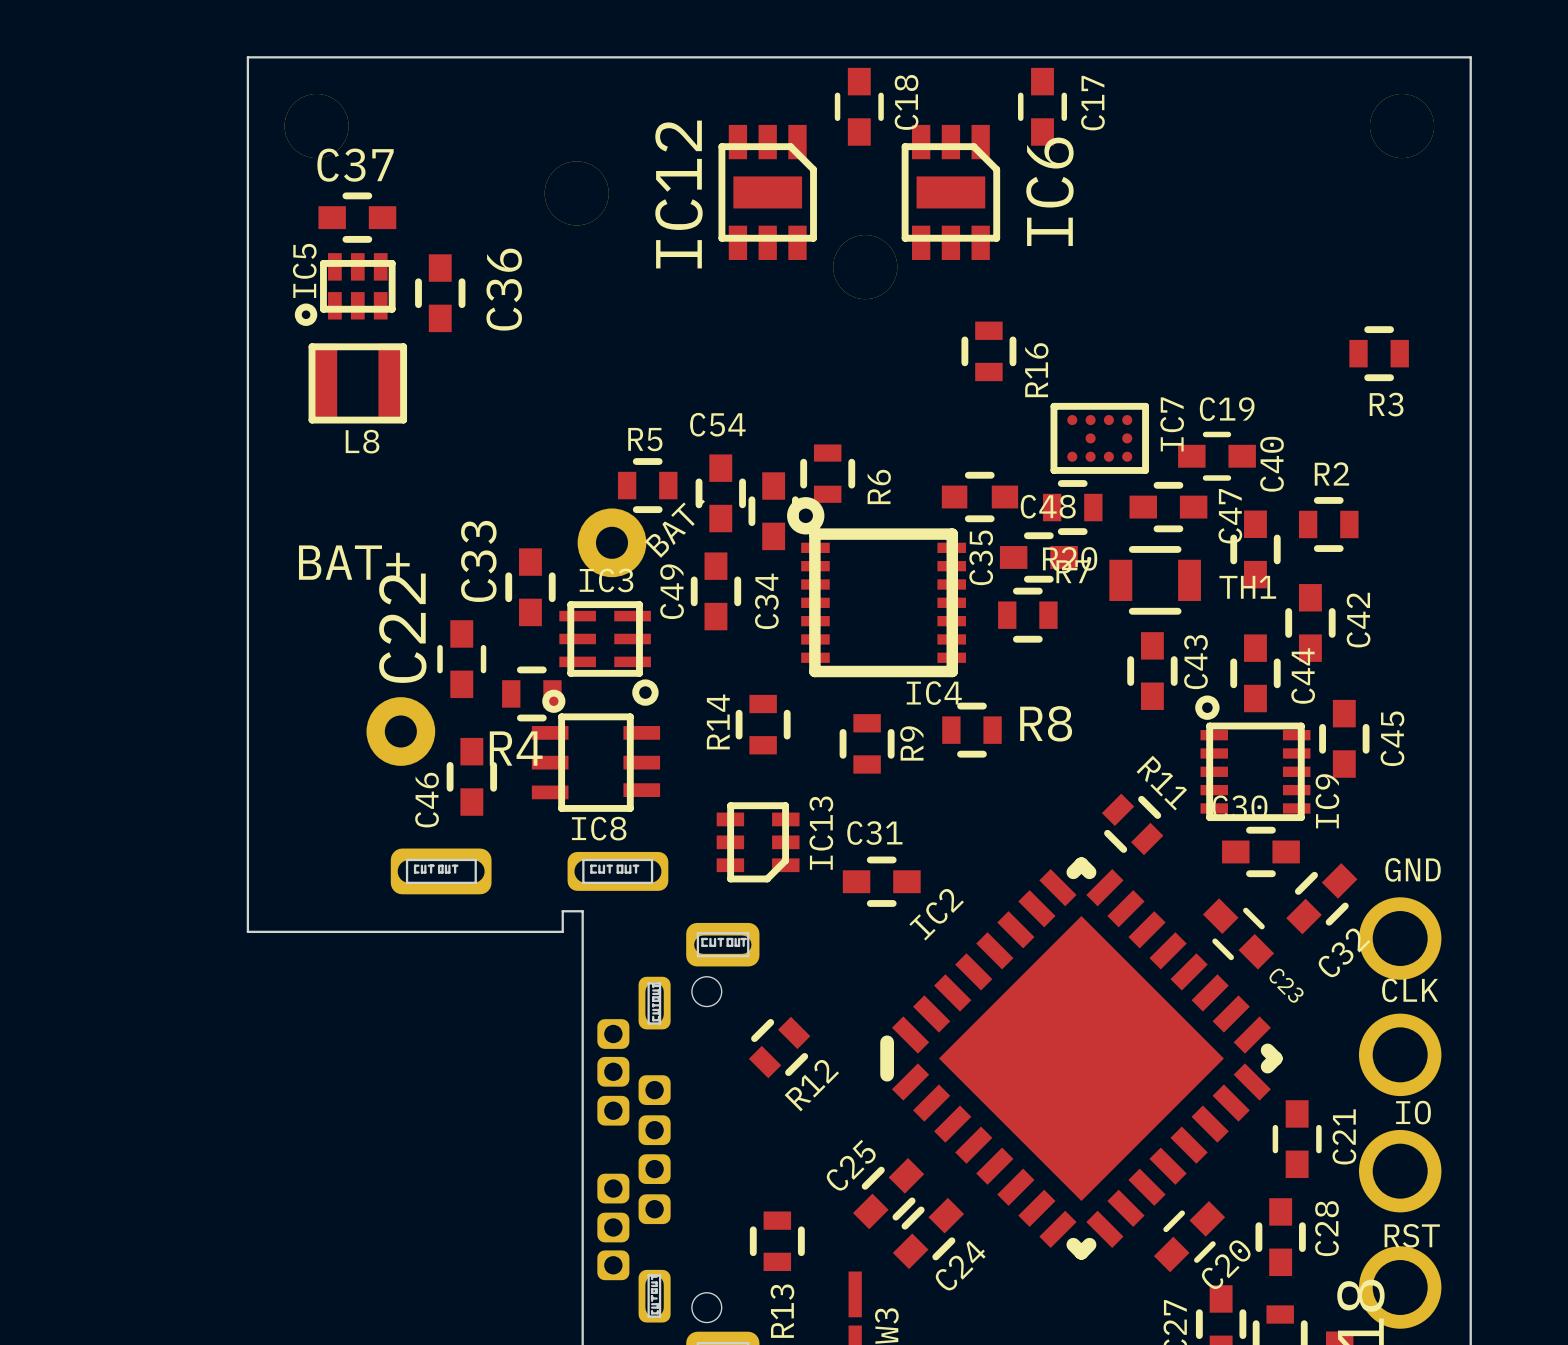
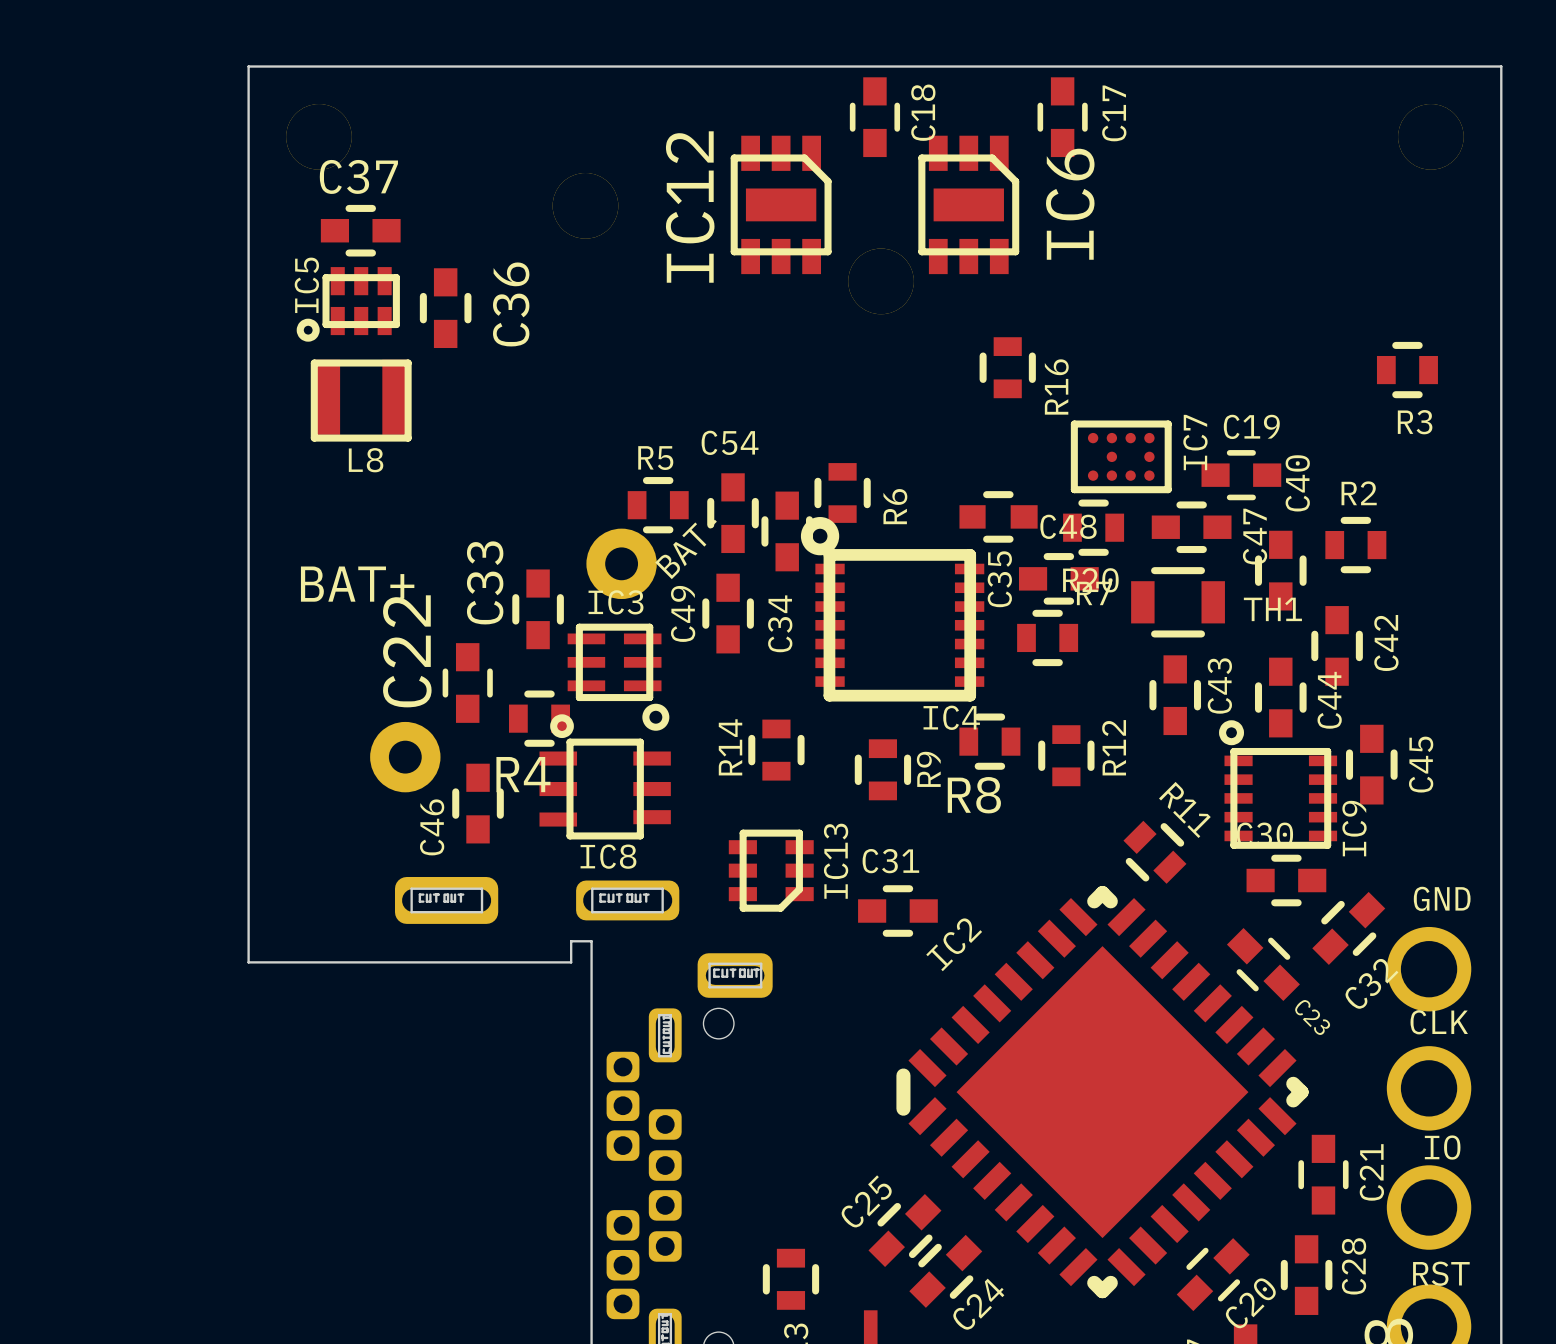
R8 name position: R8 (1046, 723) -> R8 (974, 795)
R8 position: (971, 730) -> (989, 741)
R12 rotation: 0° (779, 1047) -> 45° counterclockwise (1066, 755)
R12 position: (779, 1047) -> (1066, 755)

